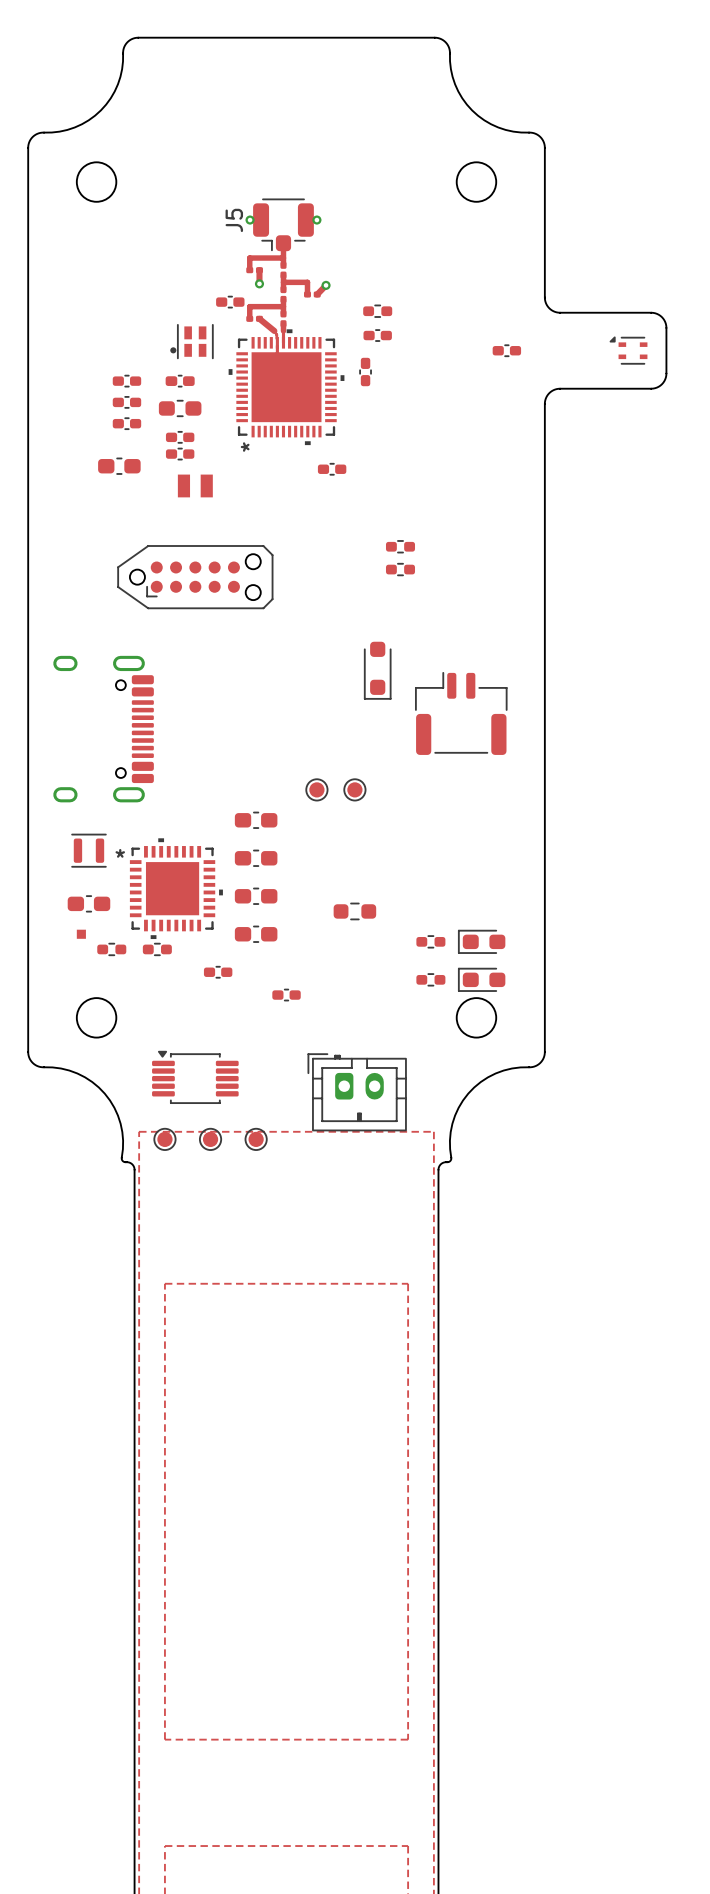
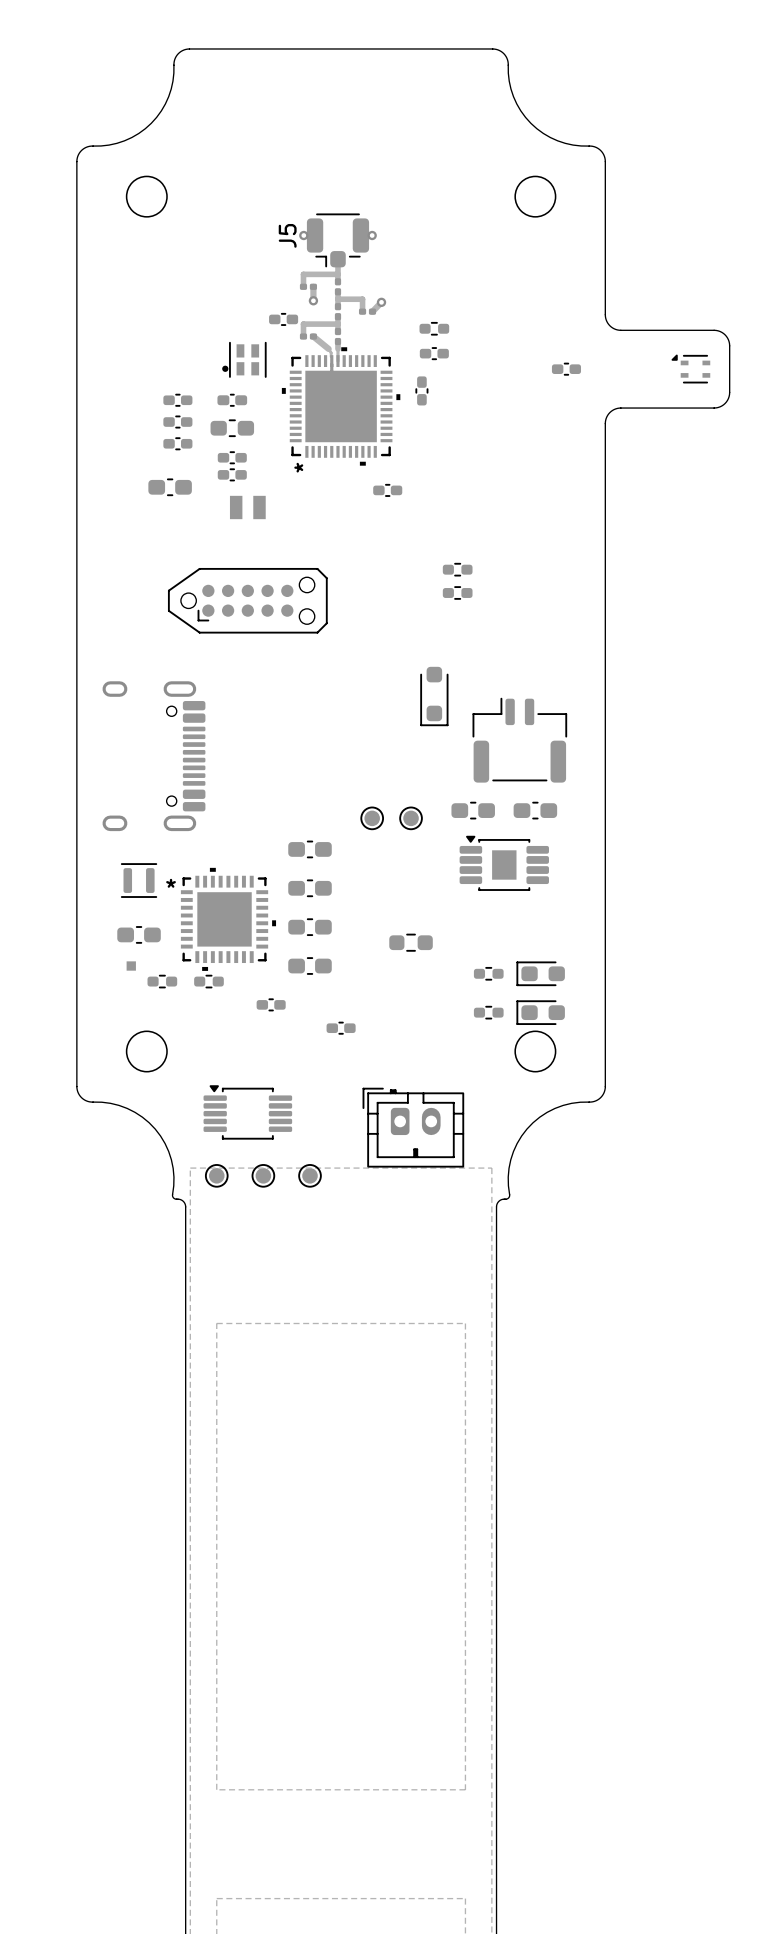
part: none -> (473, 810)
part: none -> (535, 810)
part: none -> (504, 863)

